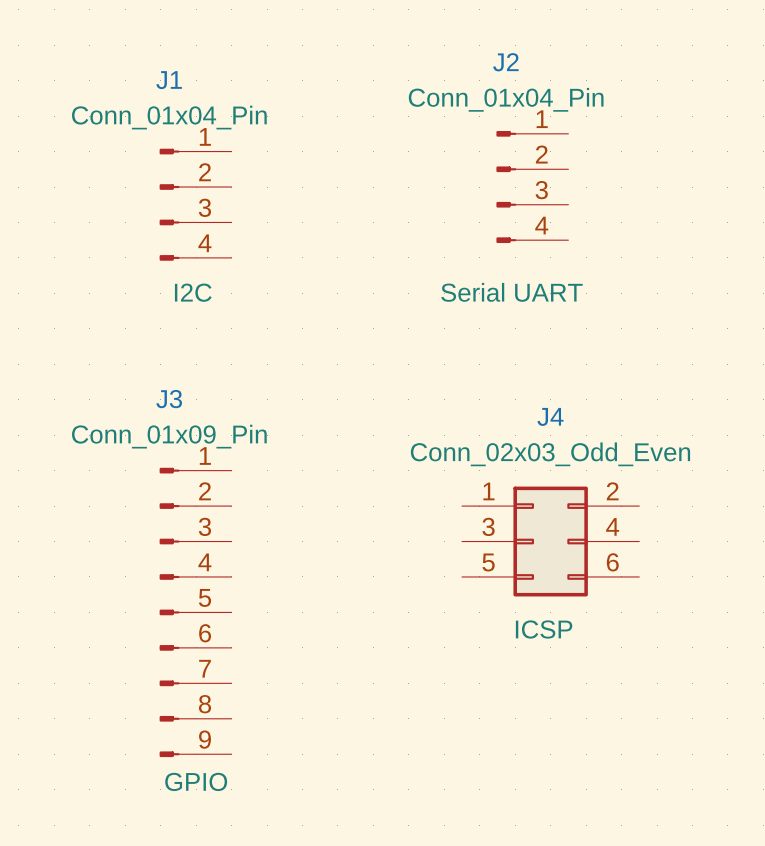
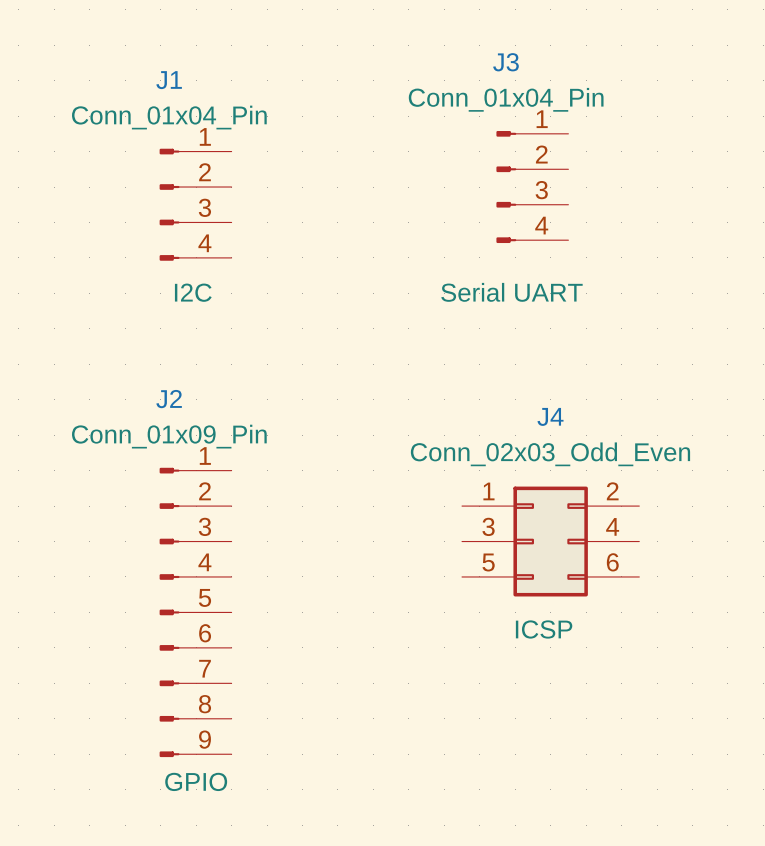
J2 name: J2 (505, 62) -> J3 (505, 62)
J3 name: J3 (169, 399) -> J2 (169, 399)

